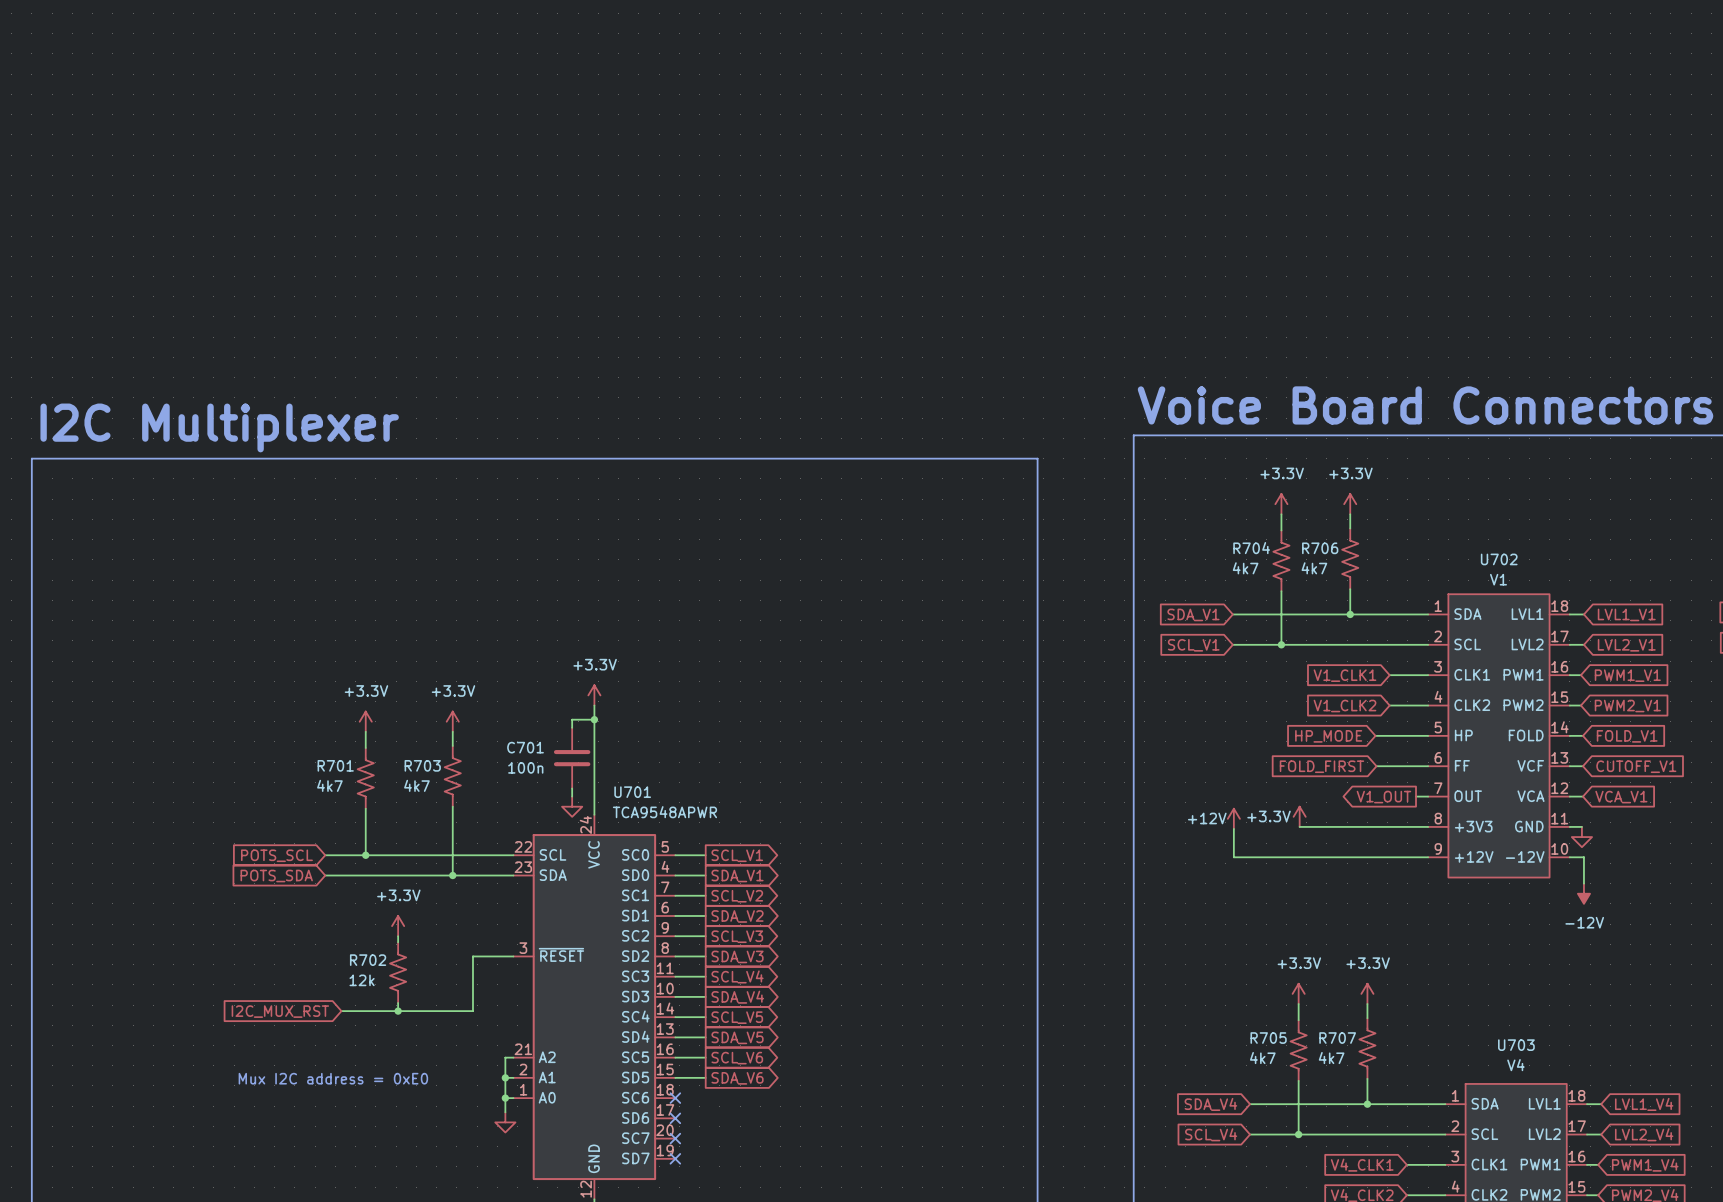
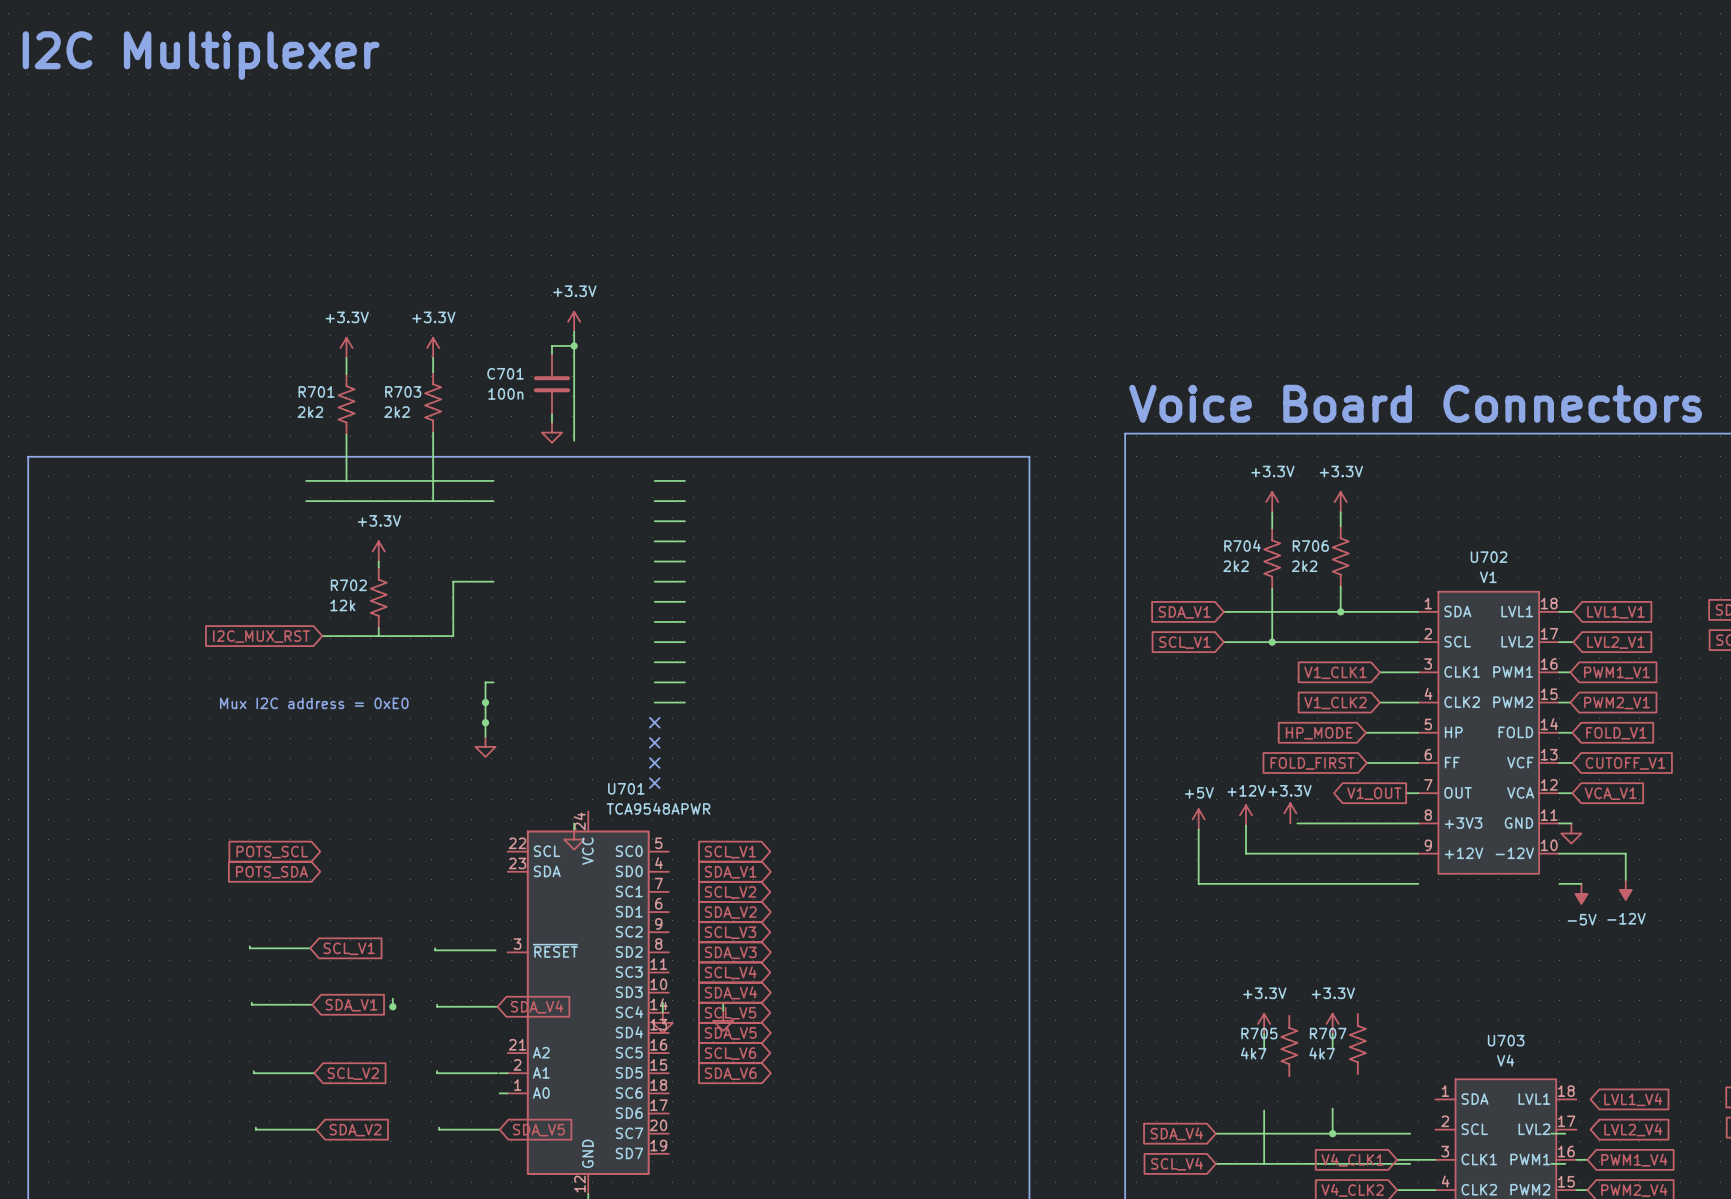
text: none -> I2C Multiplexer (201, 55)
power symbol: none -> +3.3V (574, 321)
wire: none -> (574, 331) (574, 440)
wire: none -> (574, 345) (551, 345) (551, 354)
junction: none -> (574, 345)
power symbol: none -> +3.3V (346, 347)
power symbol: none -> +3.3V (433, 347)
wire: none -> (346, 358) (346, 374)
wire: none -> (433, 358) (433, 372)
wire: none -> (551, 414) (551, 422)
text: I2C Multiplexer (219, 427) -> none
wire: none -> (433, 432) (433, 501)
power symbol: none -> (551, 432)
wire: none -> (346, 434) (346, 480)
wire: none -> (306, 480) (493, 480)
wire: none -> (654, 480) (684, 480)
wire: none -> (306, 501) (493, 501)
wire: none -> (654, 501) (684, 501)
wire: none -> (654, 521) (684, 521)
wire: none -> (654, 541) (684, 541)
power symbol: none -> +3.3V (378, 551)
wire: none -> (378, 561) (378, 567)
wire: none -> (654, 561) (684, 561)
R704 value: 4k7 (1245, 568) -> 2k2 (1236, 566)
R706 value: 4k7 (1314, 568) -> 2k2 (1304, 566)
wire: none -> (493, 581) (453, 581) (453, 636) (322, 636)
wire: none -> (654, 581) (684, 581)
wire: none -> (654, 601) (684, 601)
wire: none -> (654, 621) (684, 621)
wire: none -> (378, 628) (378, 636)
global label: none -> I2C_MUX_RST (261, 636)
wire: none -> (654, 642) (684, 642)
wire: none -> (493, 682) (485, 682) (485, 736)
power symbol: +3.3V (594, 695) -> none
junction: none -> (485, 702)
wire: (594, 705) (594, 814) -> none
text: none -> Mux I2C address = 0xE0 (314, 703)
wire: (594, 719) (572, 719) (572, 727) -> none
junction: (594, 719) -> none
power symbol: +3.3V (365, 721) -> none
power symbol: +3.3V (452, 721) -> none
junction: none -> (485, 722)
no-connect mark: none -> (654, 722)
wire: (365, 731) (365, 748) -> none
wire: (452, 731) (452, 746) -> none
no-connect mark: none -> (654, 742)
power symbol: none -> (485, 746)
C701 position: (572, 758) -> (551, 384)
no-connect mark: none -> (654, 762)
R703 position: (452, 776) -> (433, 402)
R701 position: (365, 778) -> (346, 404)
R701 value: 4k7 (329, 785) -> 2k2 (310, 412)
R703 value: 4k7 (416, 785) -> 2k2 (396, 412)
no-connect mark: none -> (654, 783)
wire: (572, 788) (572, 796) -> none
wire: (452, 806) (452, 875) -> none
power symbol position: (572, 806) -> (574, 839)
wire: (365, 808) (365, 855) -> none
power symbol text position: +3.3V (1269, 816) -> +3.3V (1290, 790)
power symbol text position: +12V (1207, 818) -> +12V (1246, 790)
power symbol position: +12V (1233, 818) -> +12V (1246, 815)
power symbol: none -> +5V (1198, 819)
wire: none -> (574, 823) (574, 829)
wire: (1299, 826) (1306, 826) -> none
wire: (1233, 828) (1233, 857) (1255, 857) -> (1246, 825) (1246, 853)
wire: none -> (1198, 829) (1198, 883) (1418, 883)
wire: (325, 855) (513, 855) -> none
junction: (365, 855) -> none
wire: (675, 855) (705, 855) -> (654, 662) (684, 662)
wire: (1583, 857) (1583, 883) -> (1573, 853) (1625, 853) (1625, 879)
wire: (325, 875) (513, 875) -> none
junction: (452, 875) -> none
wire: (675, 875) (705, 875) -> (654, 682) (684, 682)
wire: none -> (1559, 883) (1581, 883)
power symbol position: -12V (1583, 893) -> -12V (1625, 889)
wire: (675, 895) (705, 895) -> (654, 702) (684, 702)
power symbol: none -> -5V (1581, 893)
wire: (675, 915) (705, 915) -> none
power symbol: +3.3V (398, 926) -> none
wire: (398, 936) (398, 942) -> none
wire: (675, 936) (705, 936) -> none
wire: none -> (249, 946) (249, 948) (310, 948)
global label: none -> SCL_V1 (349, 948)
wire: none -> (435, 948) (435, 950) (495, 950)
wire: (513, 956) (472, 956) (472, 1011) -> (497, 1006) (467, 1006)
wire: (675, 956) (705, 956) -> none
R702 position: (398, 972) -> (378, 597)
wire: (675, 976) (705, 976) -> none
power symbol: +3.3V (1298, 993) -> none
power symbol: +3.3V (1367, 993) -> none
wire: (675, 996) (705, 996) -> none
wire: (1298, 1004) (1298, 1020) -> (1264, 1033) (1264, 1050)
wire: (1367, 1004) (1367, 1018) -> (1332, 1033) (1332, 1048)
wire: none -> (251, 1002) (251, 1004) (312, 1004)
wire: none -> (662, 1002) (662, 1012)
wire: none -> (723, 1002) (723, 1010)
global label: none -> SDA_V1 (351, 1005)
global label: I2C_MUX_RST (280, 1011) -> none
wire: (341, 1011) (442, 1011) -> (437, 1004) (437, 1006)
global label: none -> SDA_V4 (537, 1006)
wire: (675, 1017) (705, 1017) -> none
power symbol: none -> (723, 1020)
power symbol: none -> (662, 1022)
power symbol: none -> +3.3V (1264, 1023)
power symbol: none -> +3.3V (1332, 1023)
wire: (675, 1037) (705, 1037) -> none
wire: (513, 1057) (505, 1057) (505, 1112) -> none
wire: (675, 1057) (705, 1057) -> none
wire: none -> (253, 1071) (253, 1073) (314, 1073)
wire: none -> (437, 1071) (437, 1073) (497, 1073)
junction: (505, 1077) -> none
wire: (675, 1077) (705, 1077) -> none
text: Mux I2C address = 0xE0 (333, 1078) -> none
global label: none -> SCL_V2 (353, 1073)
wire: (1367, 1078) (1367, 1104) -> (1332, 1108) (1332, 1133)
wire: (1298, 1080) (1298, 1134) -> (1264, 1110) (1264, 1163)
junction: (505, 1098) -> none
no-connect mark: (675, 1098) -> none
global label position: SDA_V4 (1210, 1104) -> SDA_V4 (1176, 1133)
wire: (1250, 1104) (1445, 1104) -> (1215, 1133) (1410, 1133)
junction: (1367, 1104) -> none
wire: (1587, 1104) (1601, 1104) -> (1551, 1133) (1565, 1133)
no-connect mark: (675, 1118) -> none
power symbol: (505, 1122) -> none
wire: none -> (255, 1127) (255, 1129) (316, 1129)
wire: none -> (439, 1127) (439, 1129) (499, 1129)
global label position: SCL_V4 (1211, 1134) -> SCL_V4 (1177, 1164)
wire: (1250, 1134) (1445, 1134) -> (1215, 1163) (1410, 1163)
junction: (1298, 1134) -> none
wire: (1587, 1134) (1601, 1134) -> (1551, 1163) (1565, 1163)
global label: none -> SDA_V2 (355, 1130)
global label: none -> SDA_V5 (538, 1130)
no-connect mark: (675, 1138) -> none
junction: none -> (1332, 1133)
no-connect mark: (675, 1158) -> none

